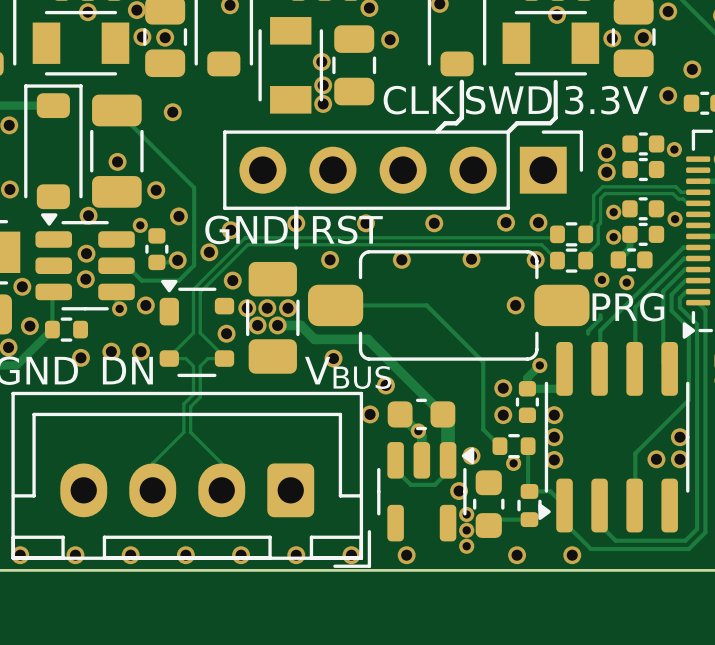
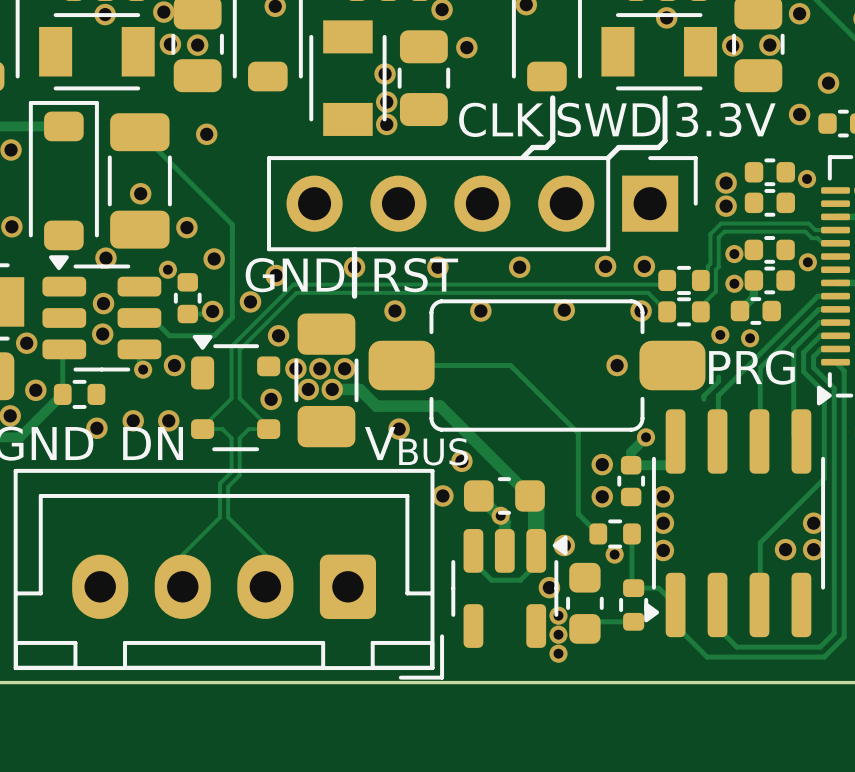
via: (20, 555) -> none
via: (75, 555) -> none
via: (130, 555) -> none
via: (185, 555) -> none
via: (241, 555) -> none
via: (296, 555) -> none
via: (351, 555) -> none
via: (406, 555) -> none
via: (517, 555) -> none
via: (572, 555) -> none

